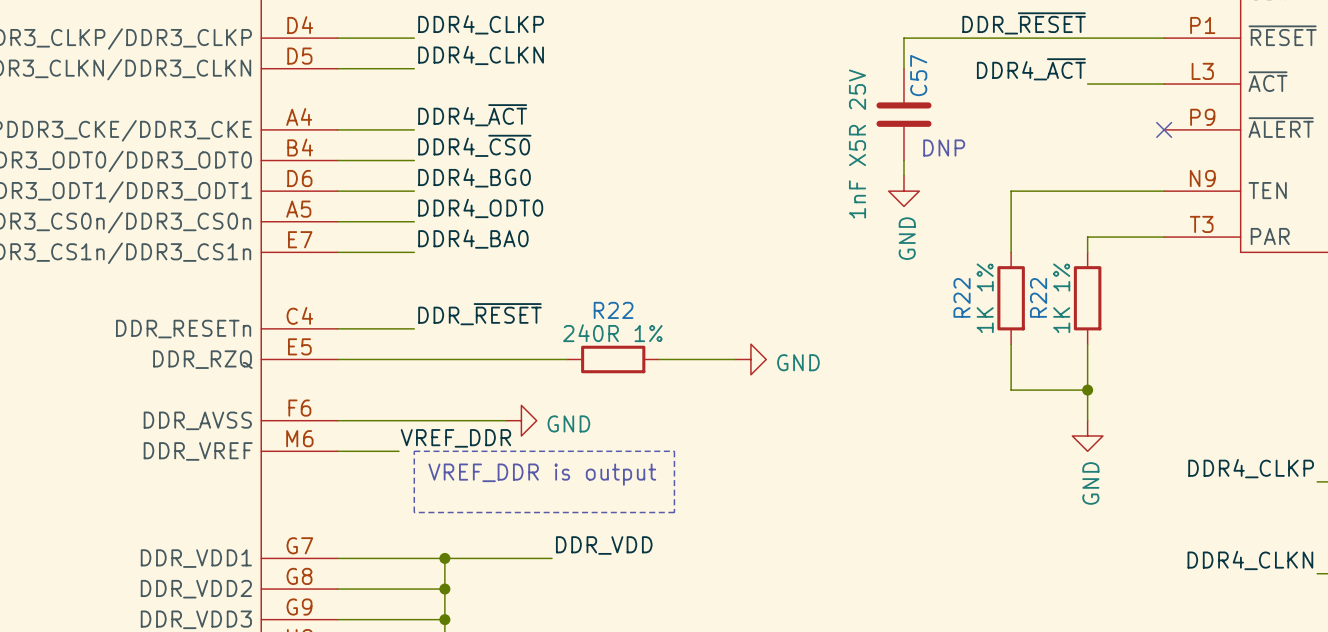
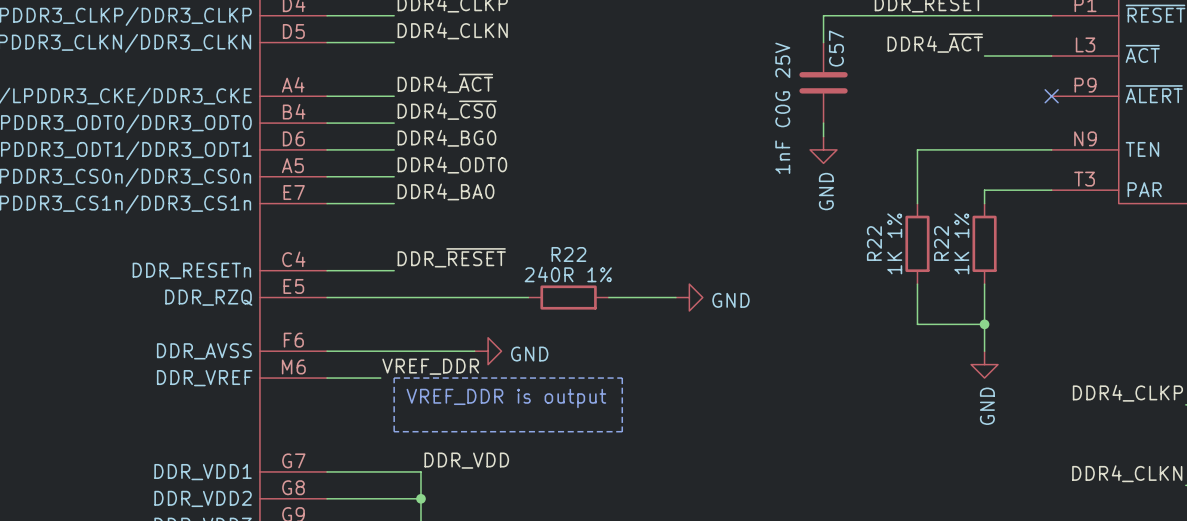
C57 value: 1nF X5R 25V (857, 144) -> 1nF C0G 25V (782, 108)
text: DNP (944, 148) -> none
label position: DDR_VDD (604, 545) -> DDR_VDD (466, 460)
wire: (444, 558) (552, 558) -> none
junction: (444, 558) -> none

